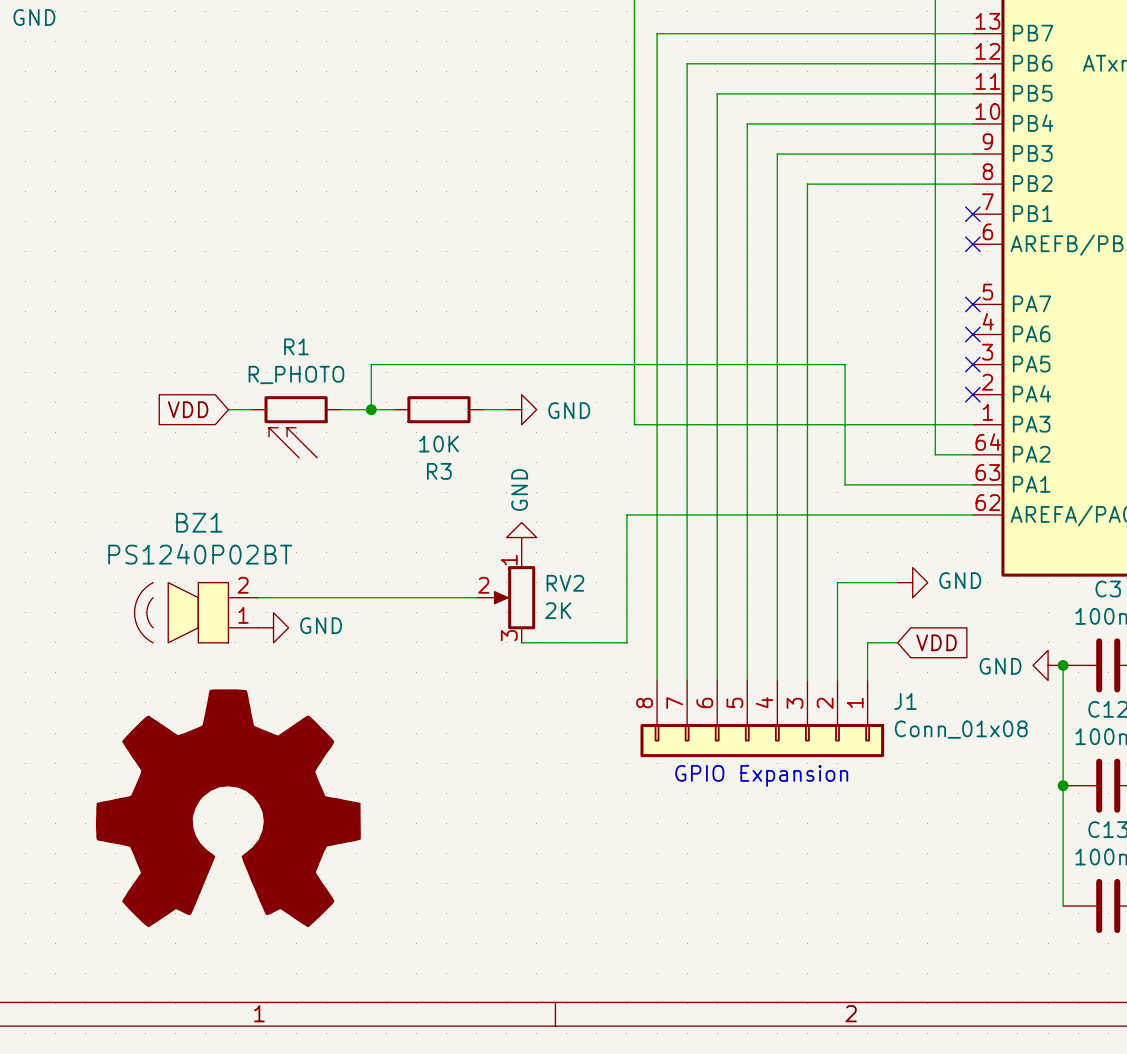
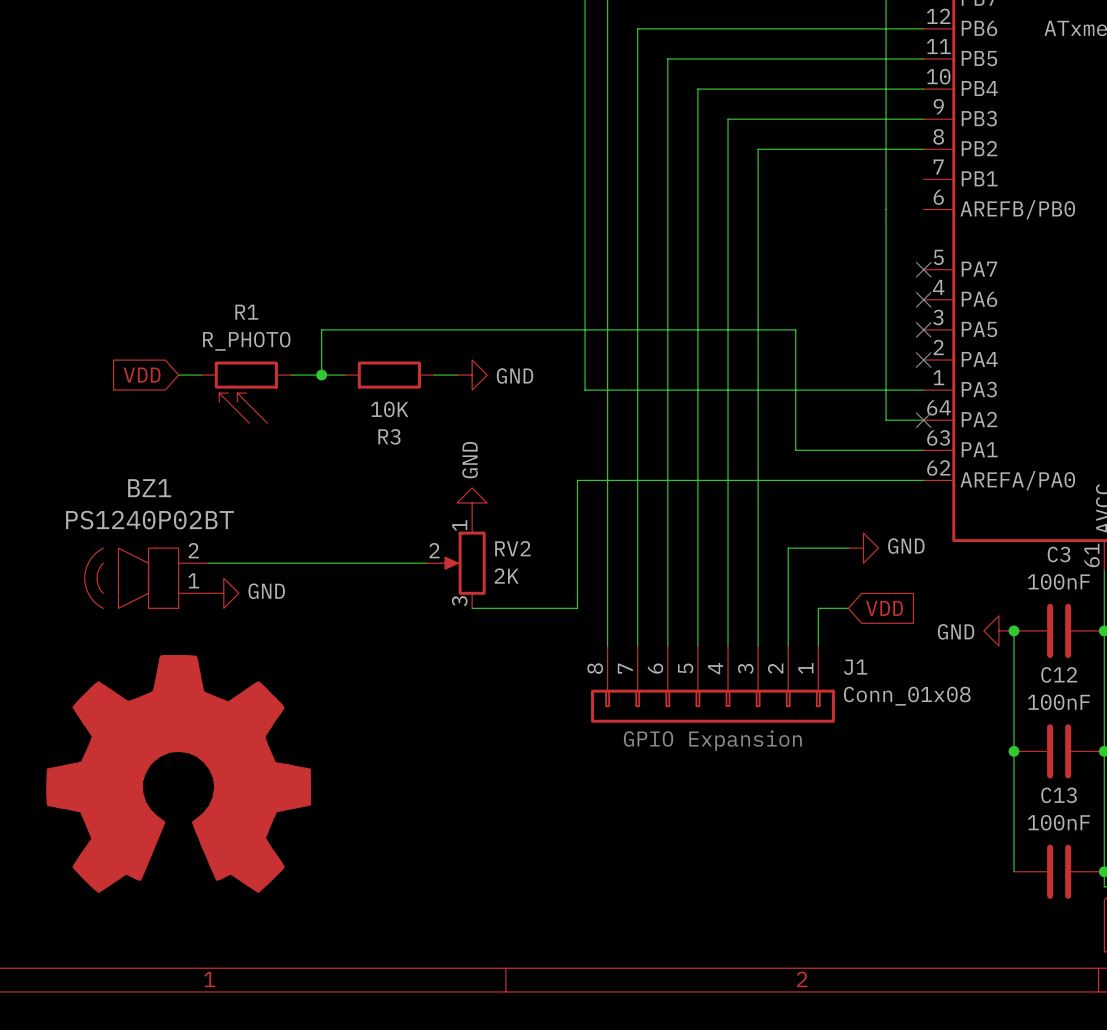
no-connect mark: (972, 214) -> none
no-connect mark: (972, 244) -> none
no-connect mark: none -> (923, 420)

